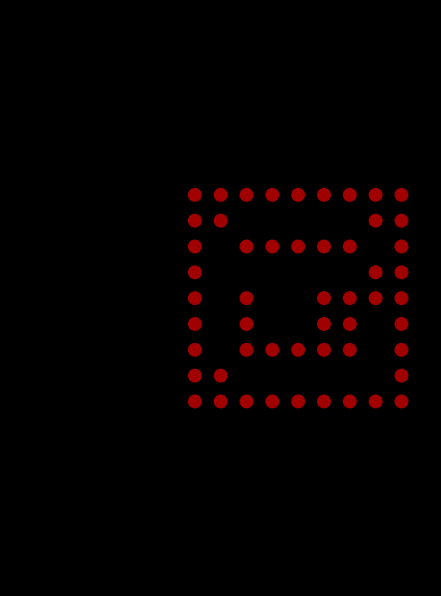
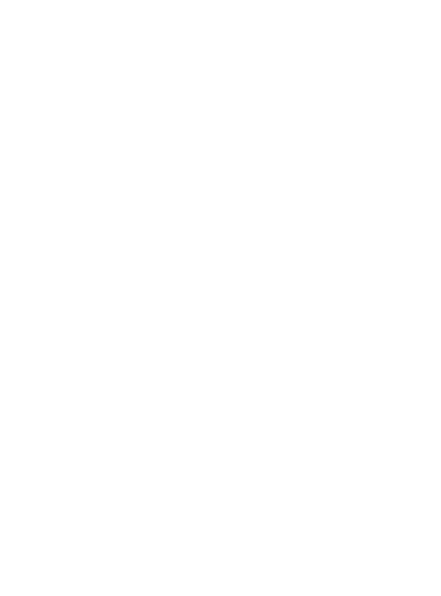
part: (298, 298) -> none

